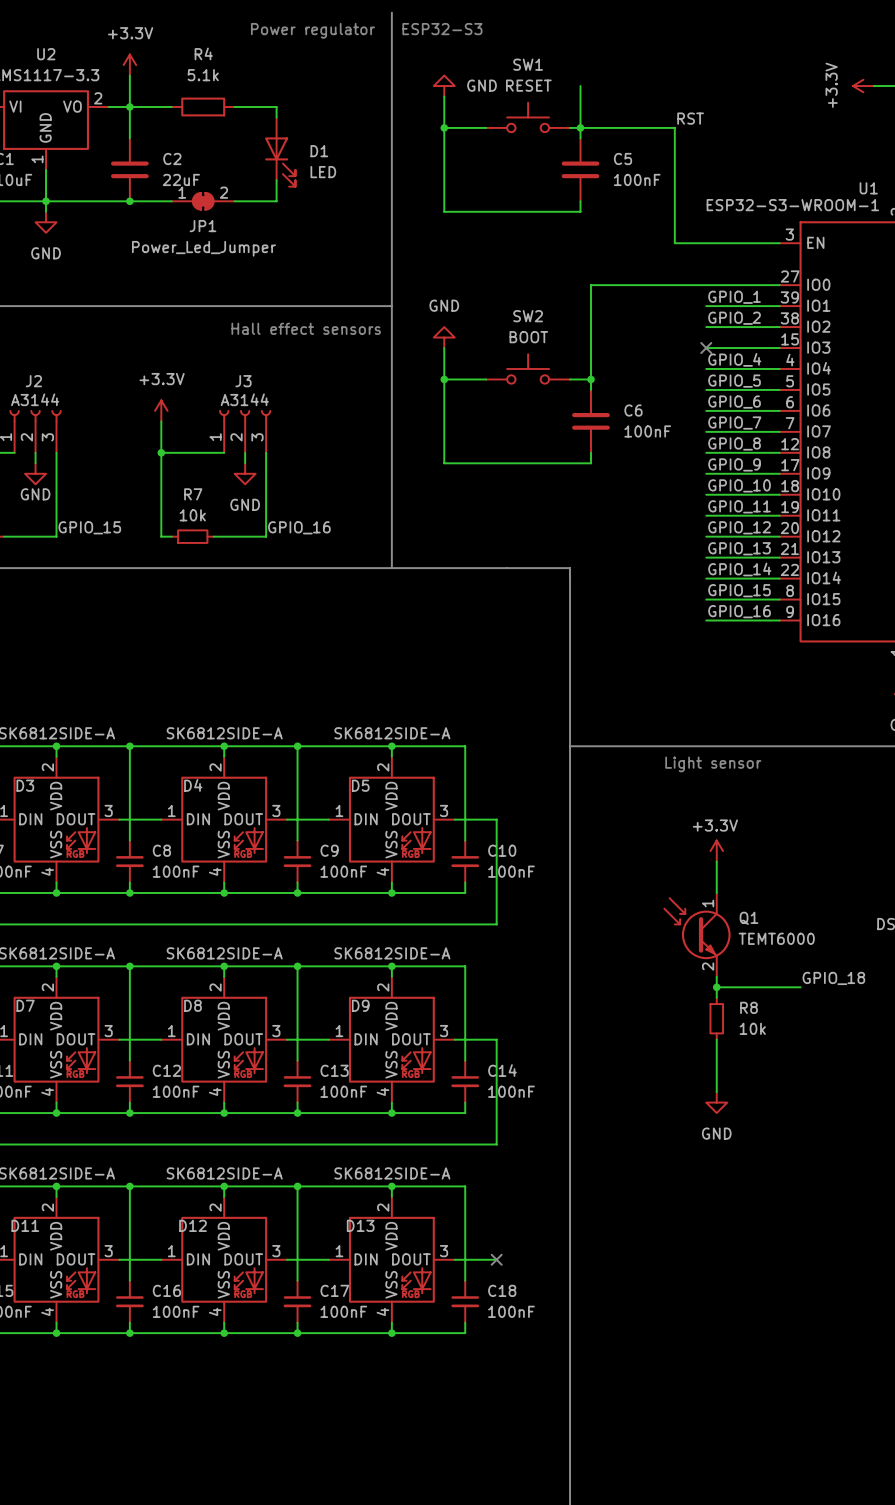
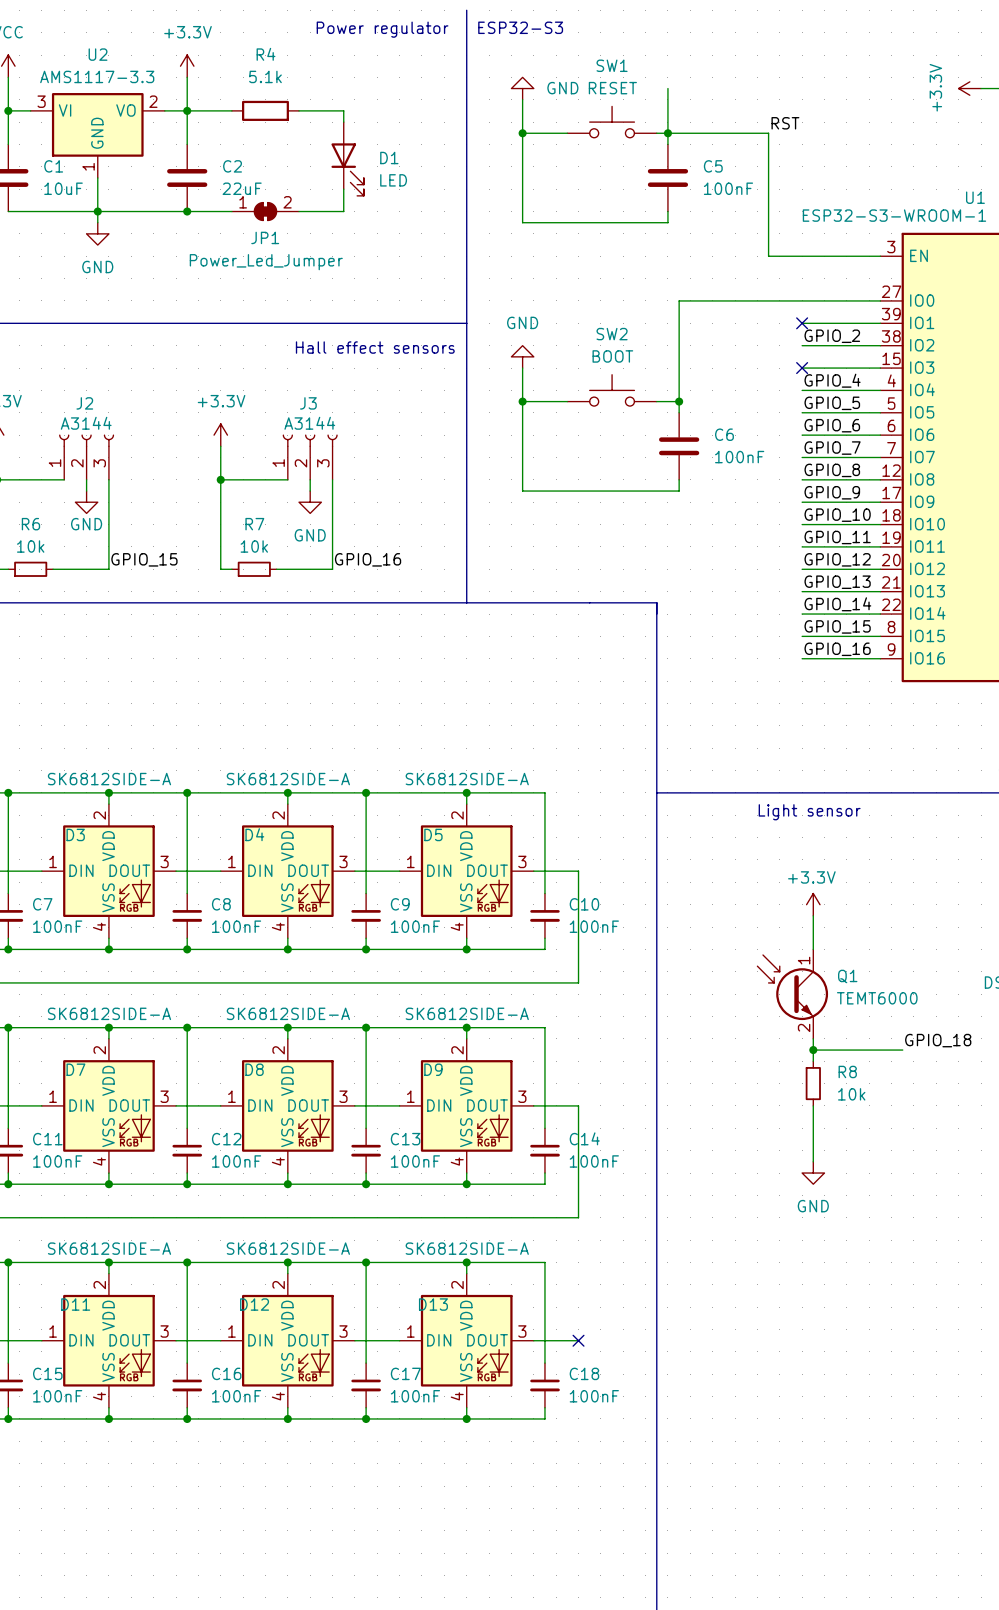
label: GPIO_1 (734, 297) -> none
no-connect mark: none -> (802, 323)

